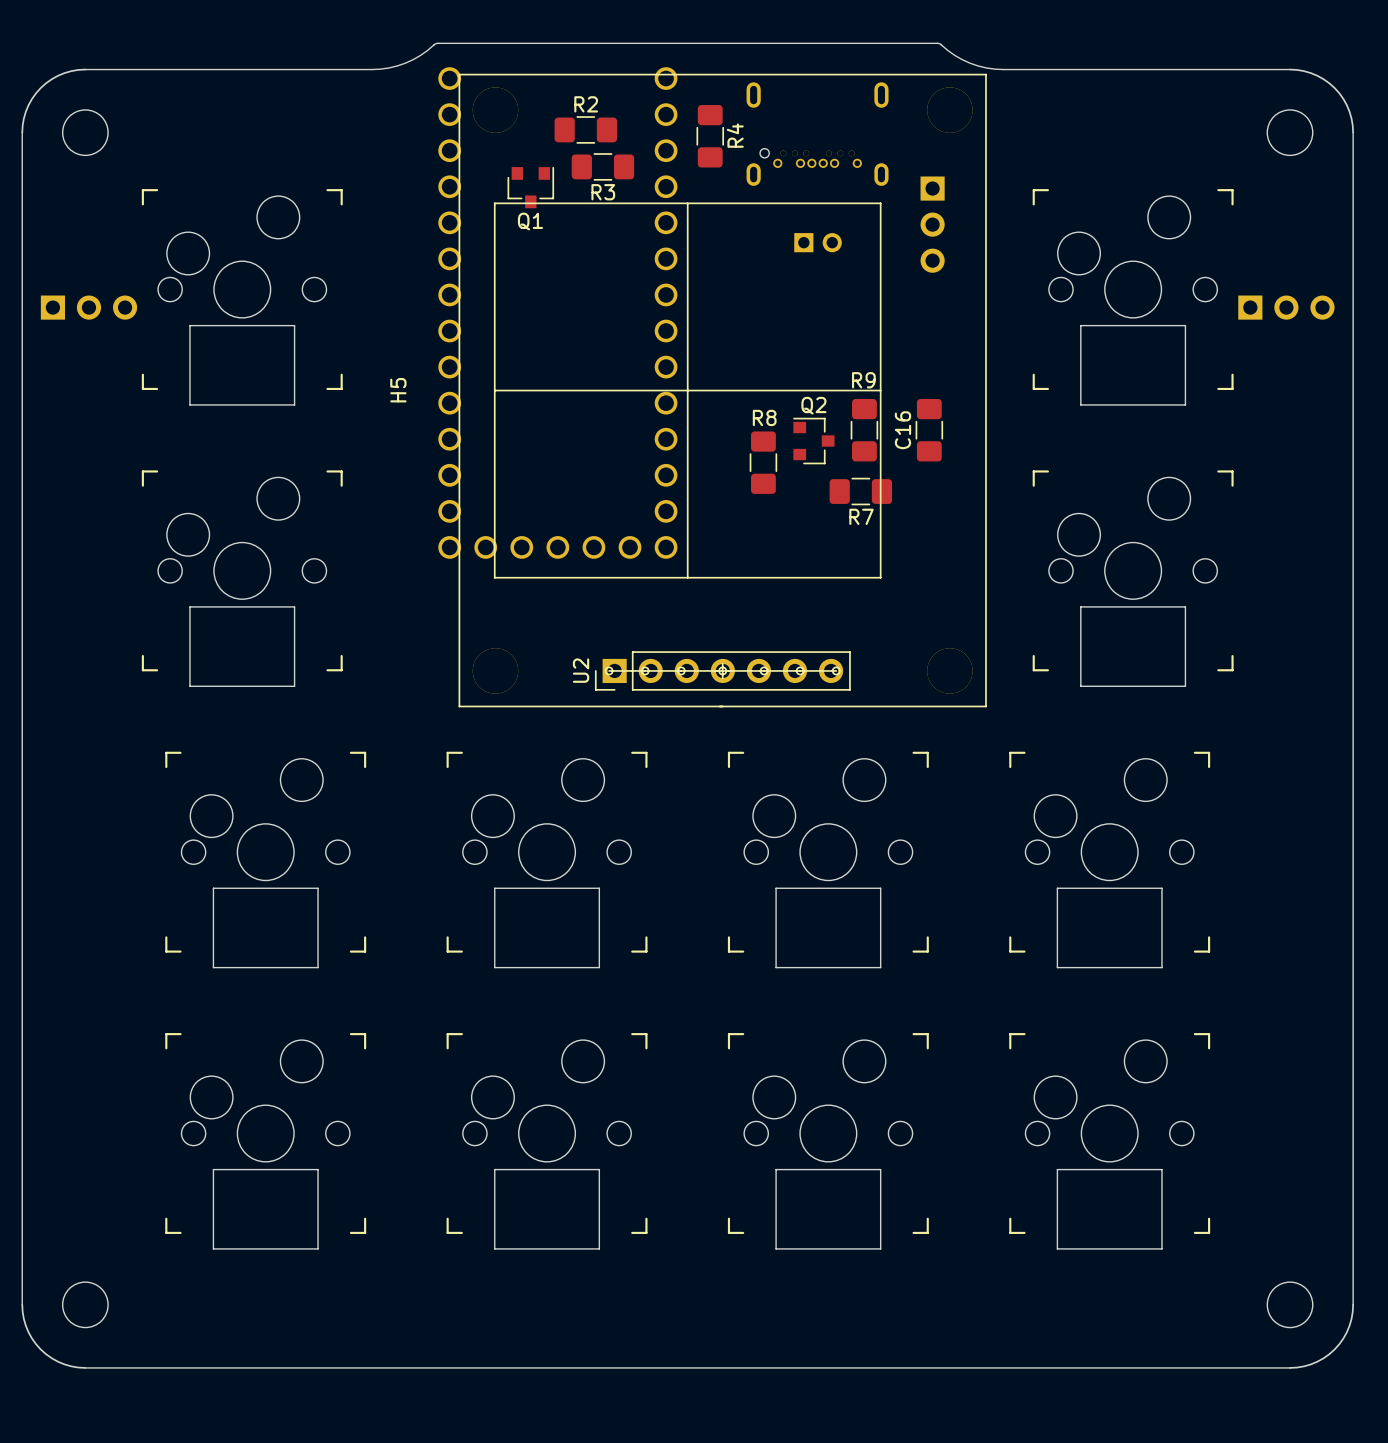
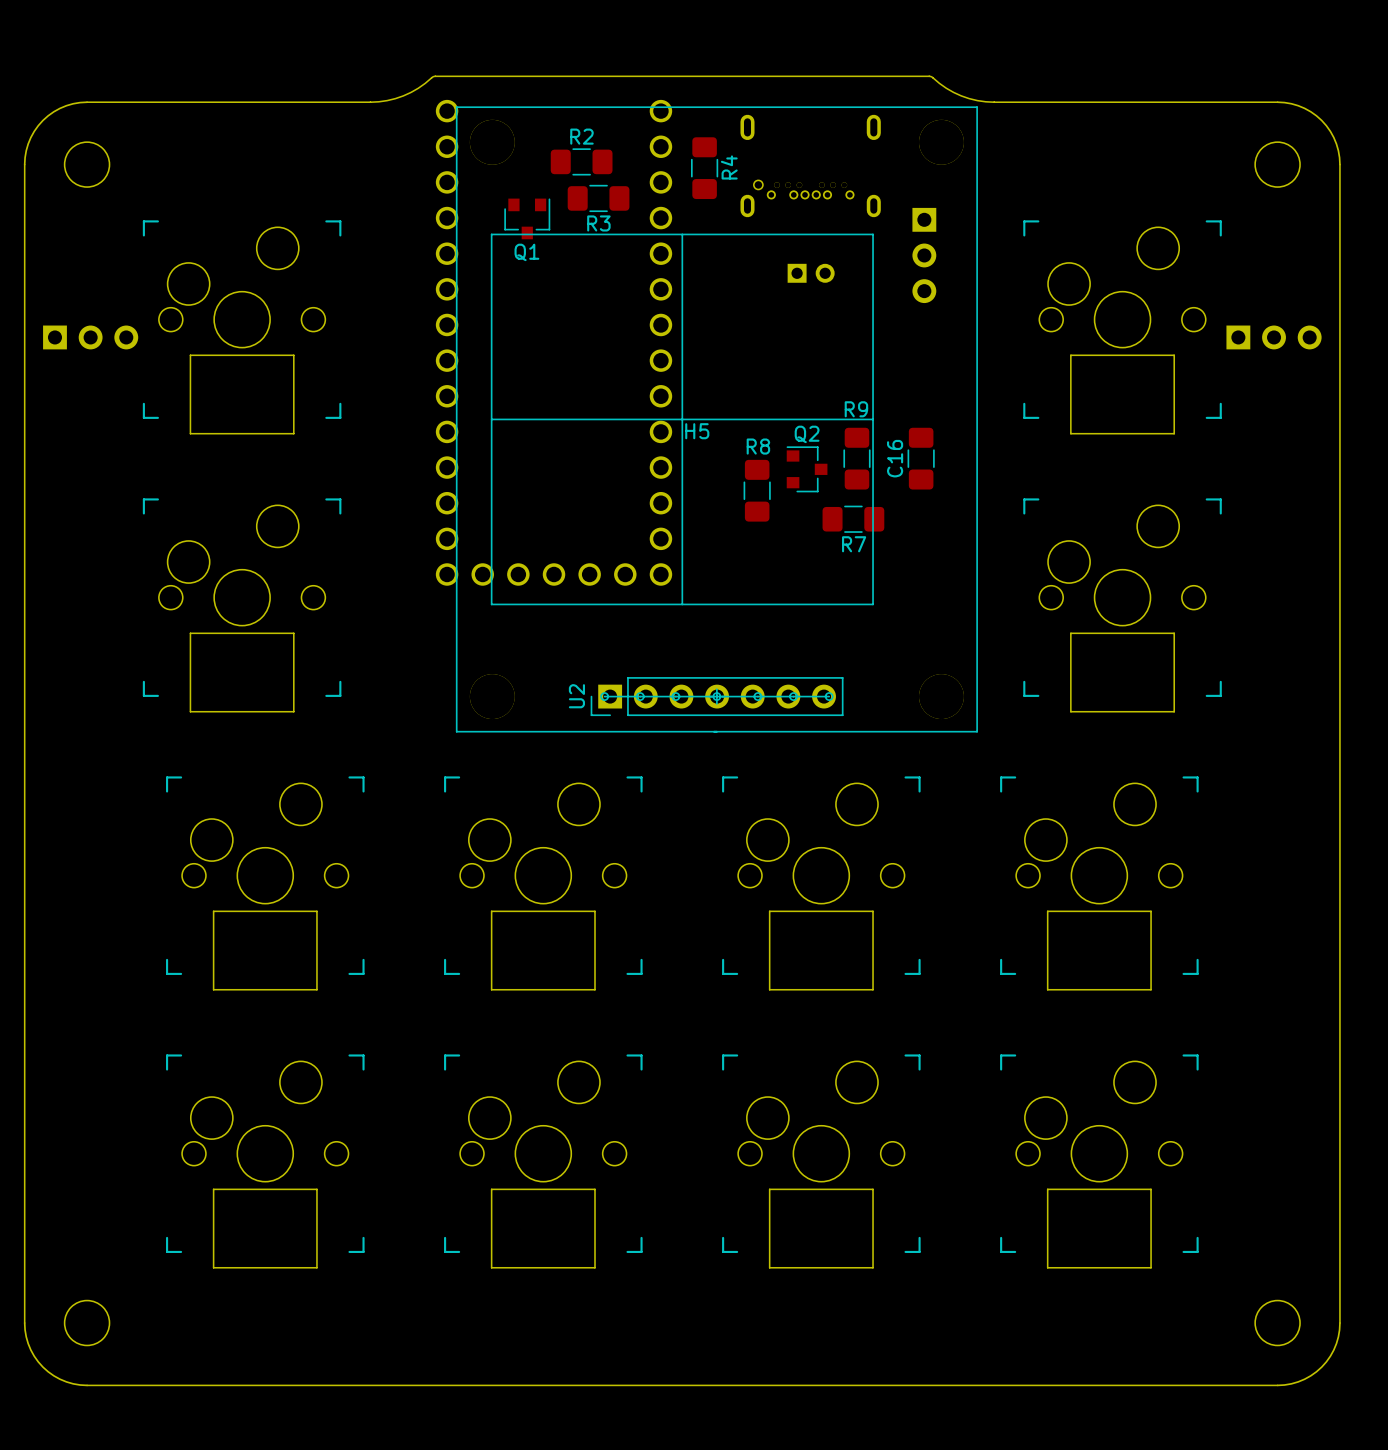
H5 name rotation: 0° (398, 390) -> 90° clockwise (697, 431)
H5 name position: H5 (398, 390) -> H5 (697, 431)

